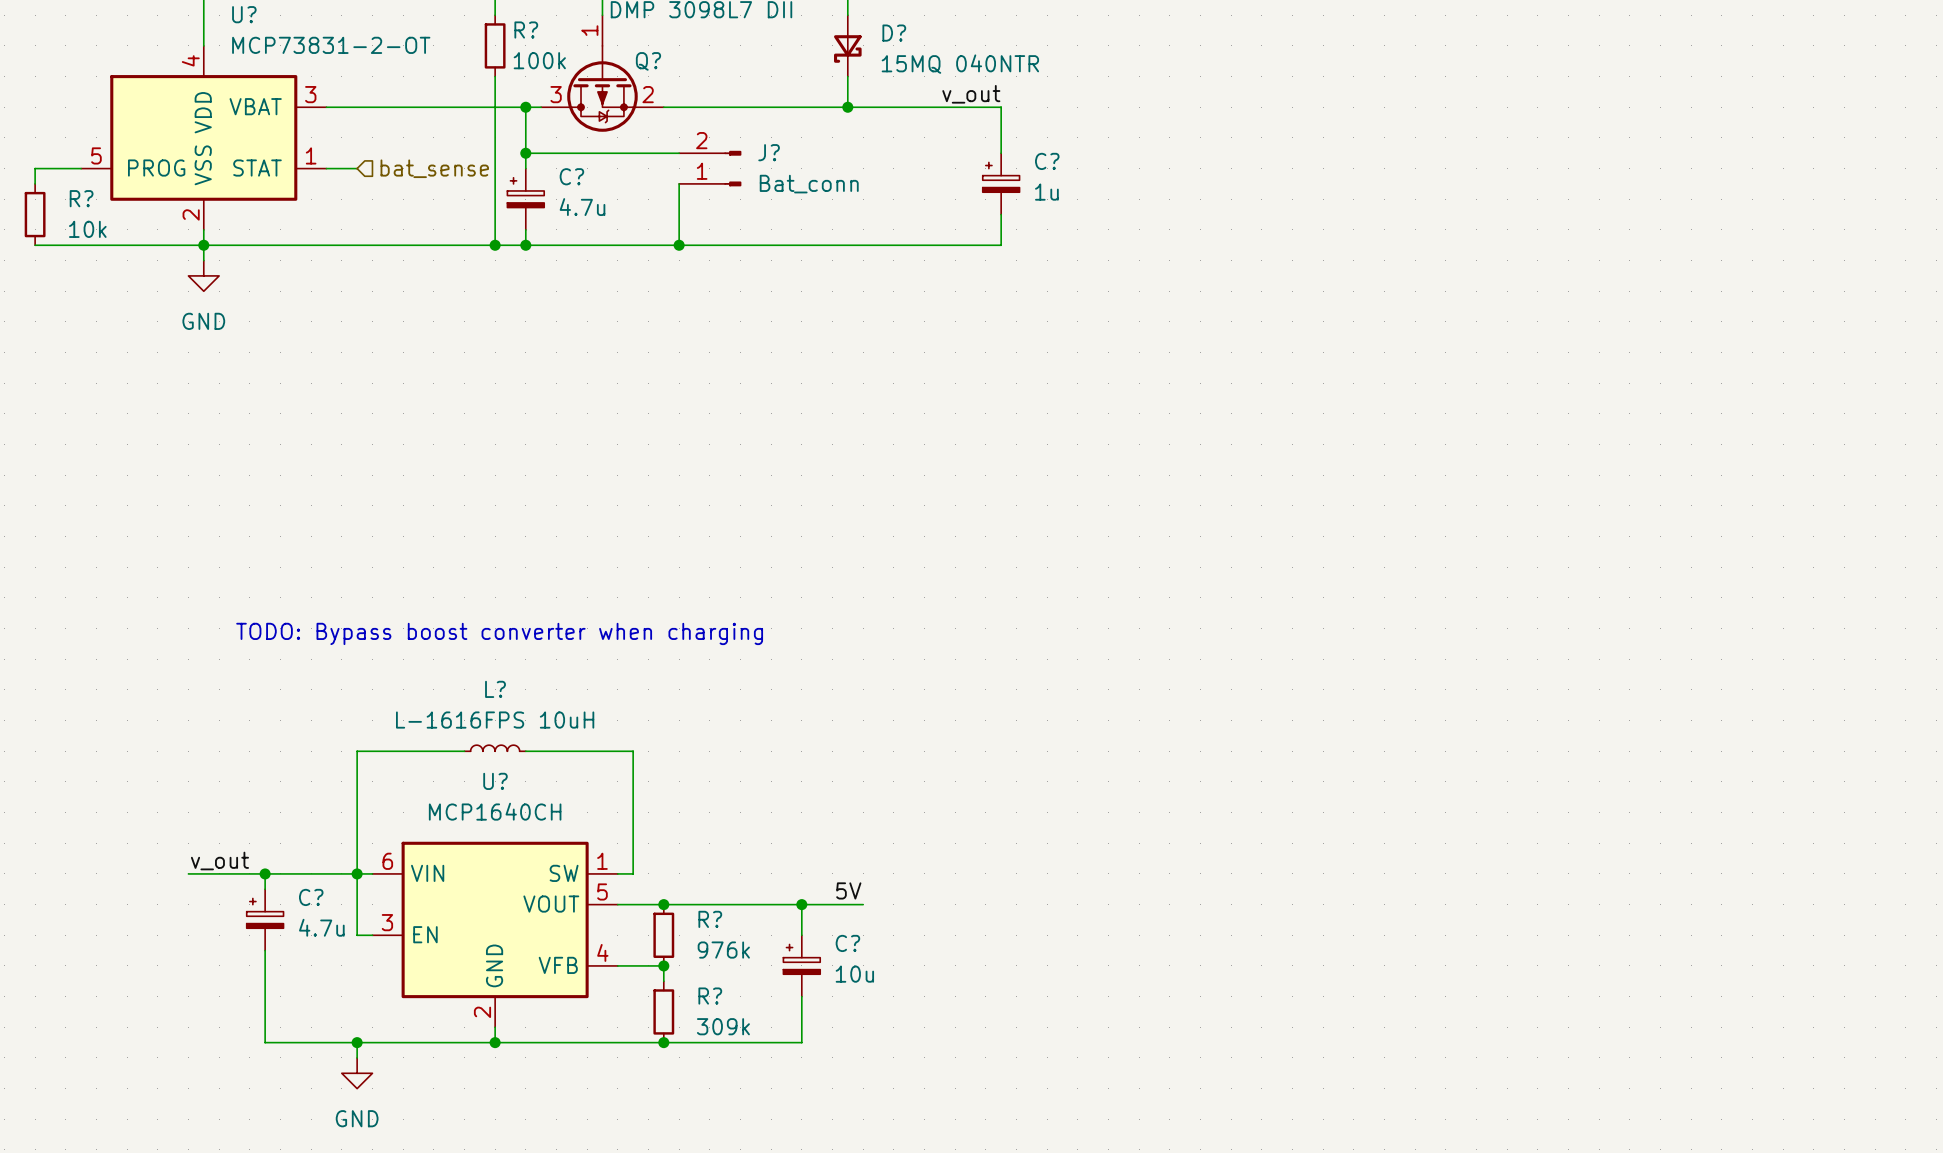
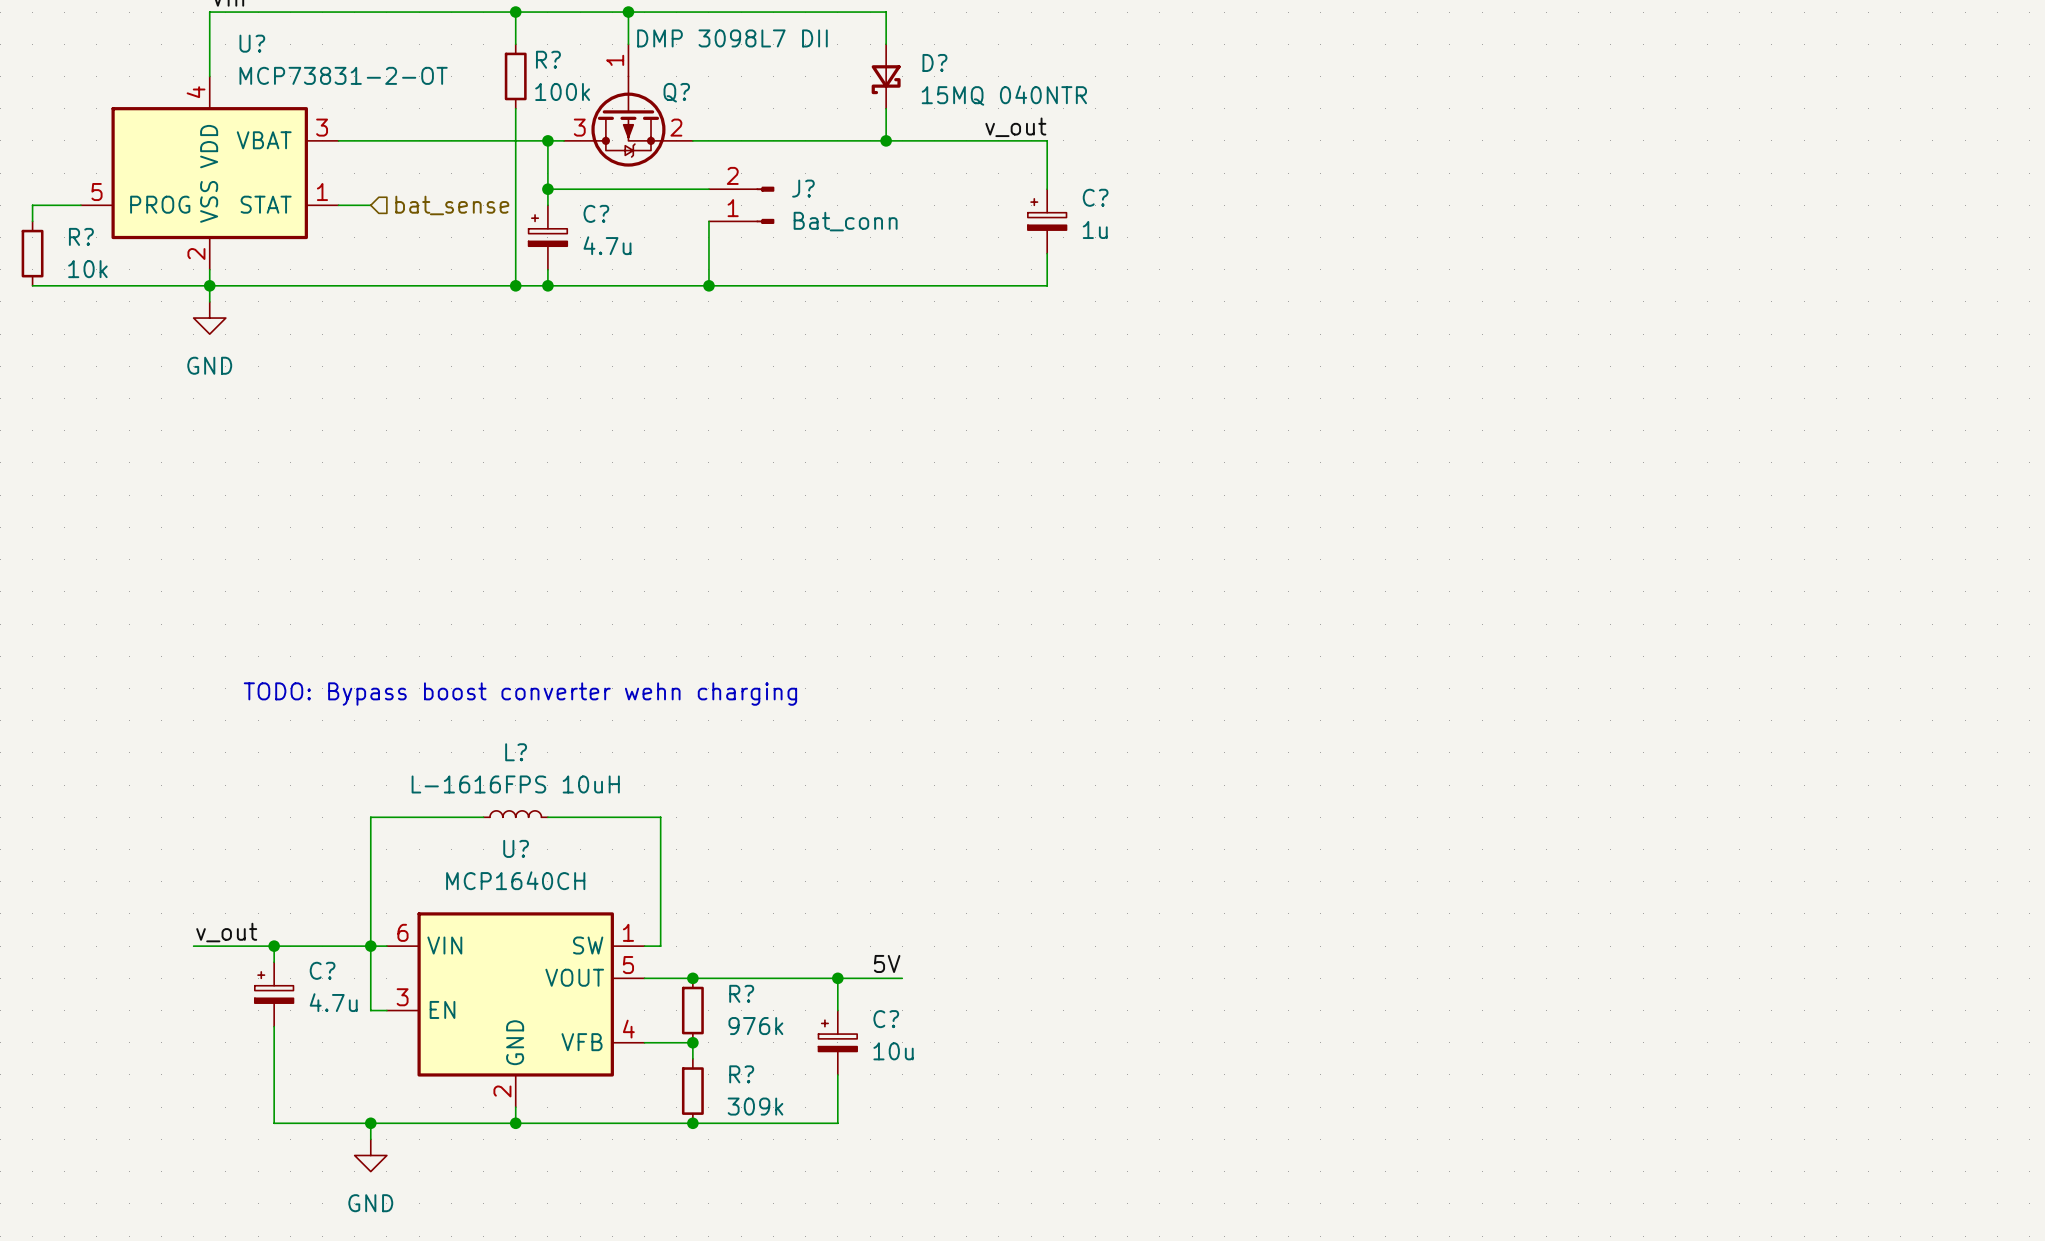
text: TODO: Bypass boost converter when charging (499, 633) -> TODO: Bypass boost converter wehn charging (520, 694)

